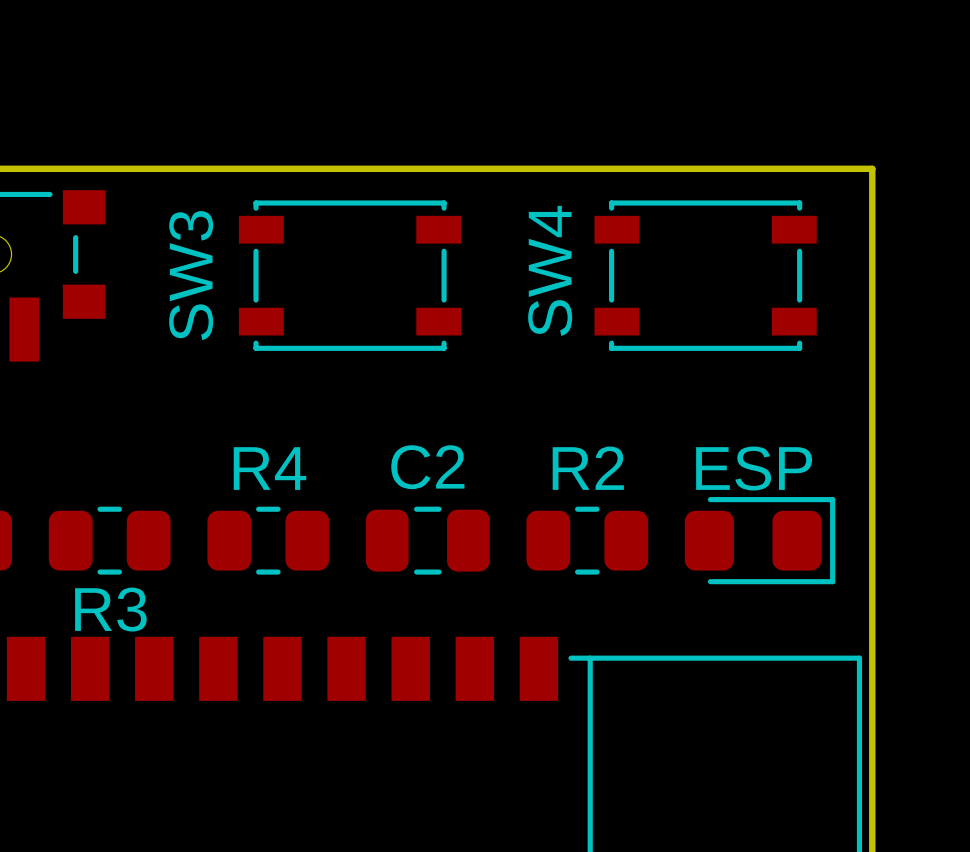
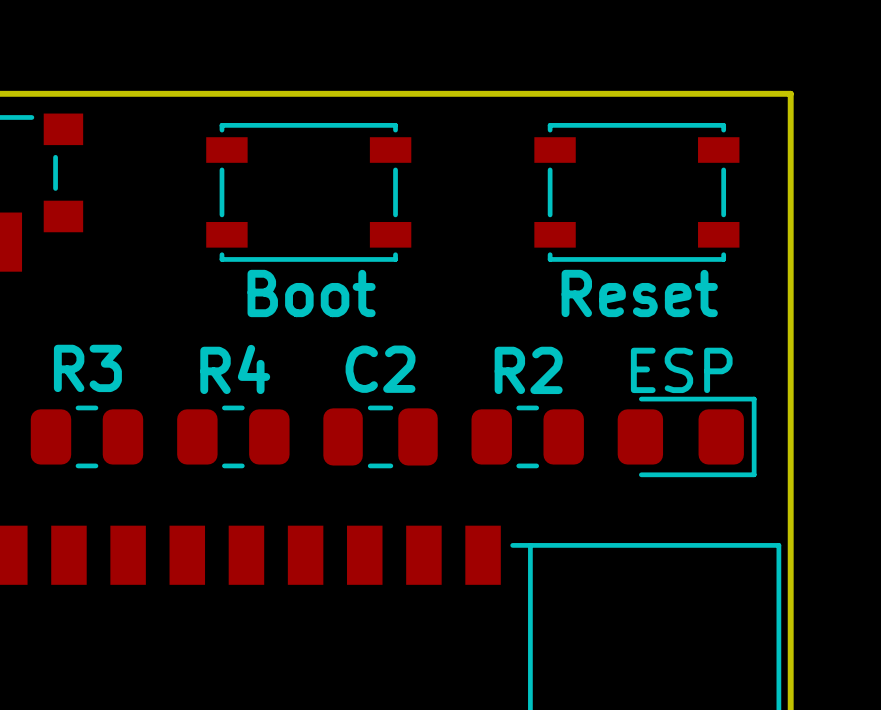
SW4 name: SW4 (550, 270) -> none
SW3 name: SW3 (191, 275) -> none
SW3 value: none -> Boot (311, 293)
SW4 value: none -> Reset (639, 293)
R3 name position: R3 (110, 609) -> R3 (87, 368)

